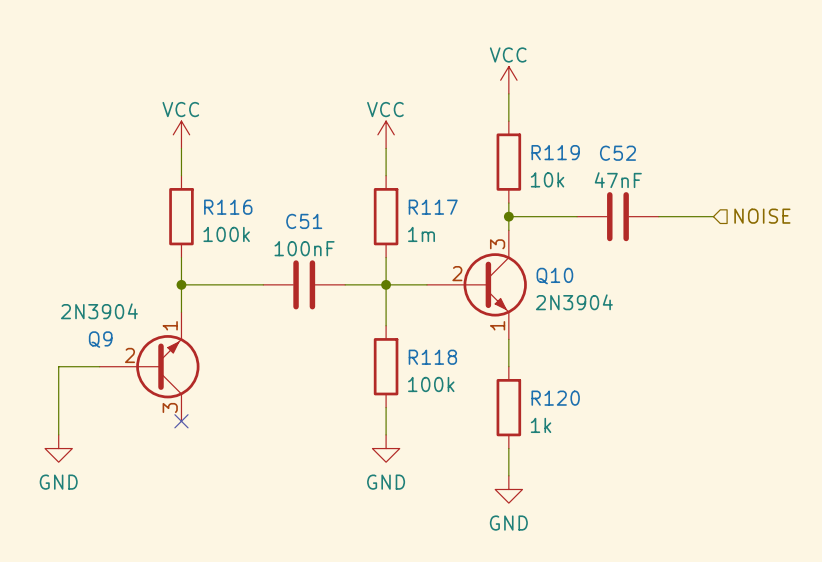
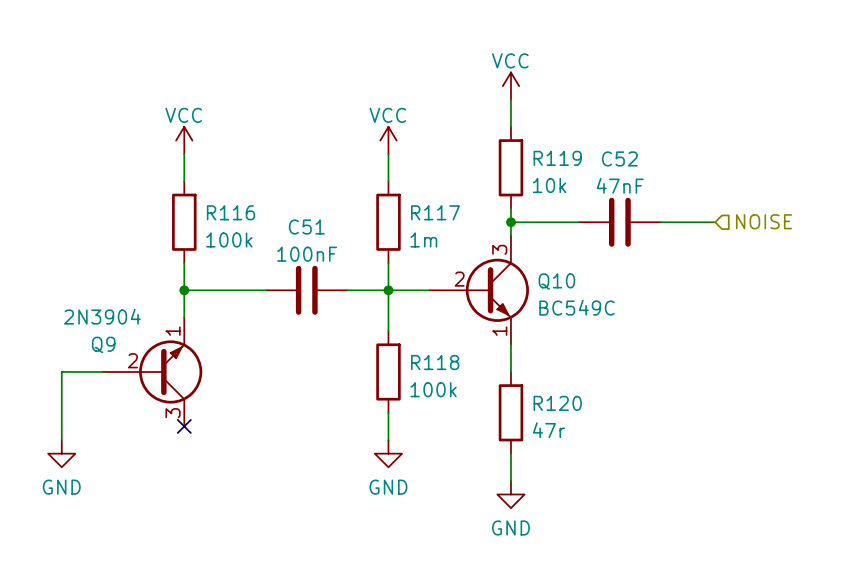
Q10 value: 2N3904 (574, 302) -> BC549C (577, 307)
R120 value: 1k (541, 425) -> 47r (548, 430)

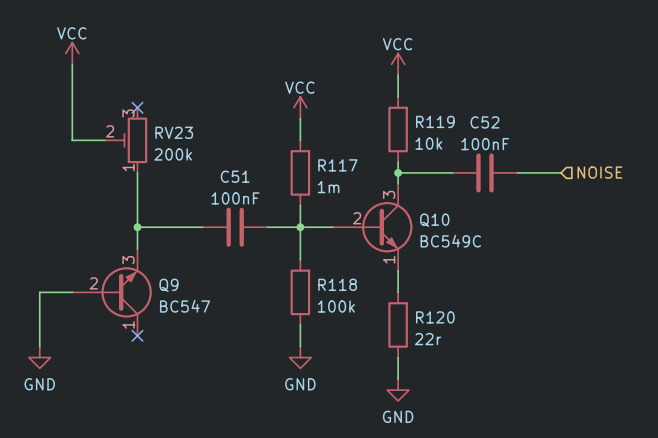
wire: none -> (72, 64) (72, 140) (104, 140)
power symbol position: VCC (184, 140) -> VCC (72, 53)
no-connect mark: none -> (137, 107)
wire: (184, 154) (184, 181) -> none
RV23: none -> 200k (126, 140)
C52 value: 47nF (620, 185) -> 100nF (485, 144)
wire: none -> (137, 172) (137, 205)
R116: 100k (184, 222) -> none
Q9 value: 2N3904 (102, 316) -> BC547 (184, 306)
Q9 symbol: [102, 317, 203, 427] -> [72, 248, 152, 336]
Q9 name position: Q9 (103, 344) -> Q9 (168, 285)
R120 value: 47r (548, 430) -> 22r (428, 339)

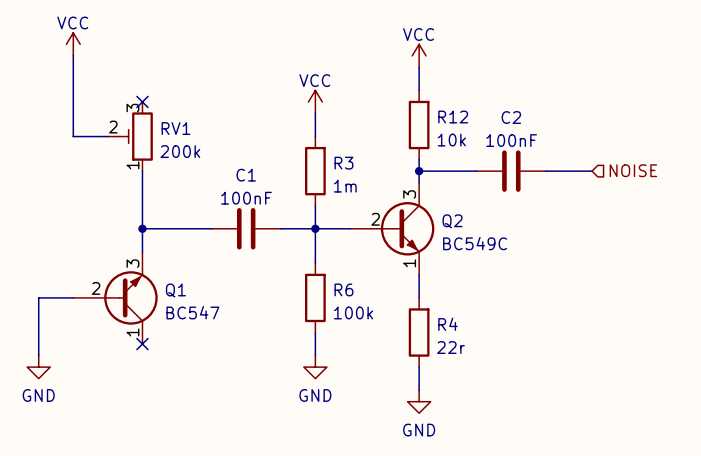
R119 name: R119 (435, 121) -> R12 (453, 117)
C52 name: C52 (484, 122) -> C2 (511, 117)
RV23 name: RV23 (174, 132) -> RV1 (175, 128)
R117 name: R117 (337, 165) -> R3 (343, 163)
C51 name: C51 (235, 176) -> C1 (246, 175)
Q10 name: Q10 (434, 220) -> Q2 (452, 221)
R118 name: R118 (337, 284) -> R6 (343, 289)
Q9 name: Q9 (168, 285) -> Q1 (175, 290)
R120 name: R120 (435, 317) -> R4 (447, 324)

